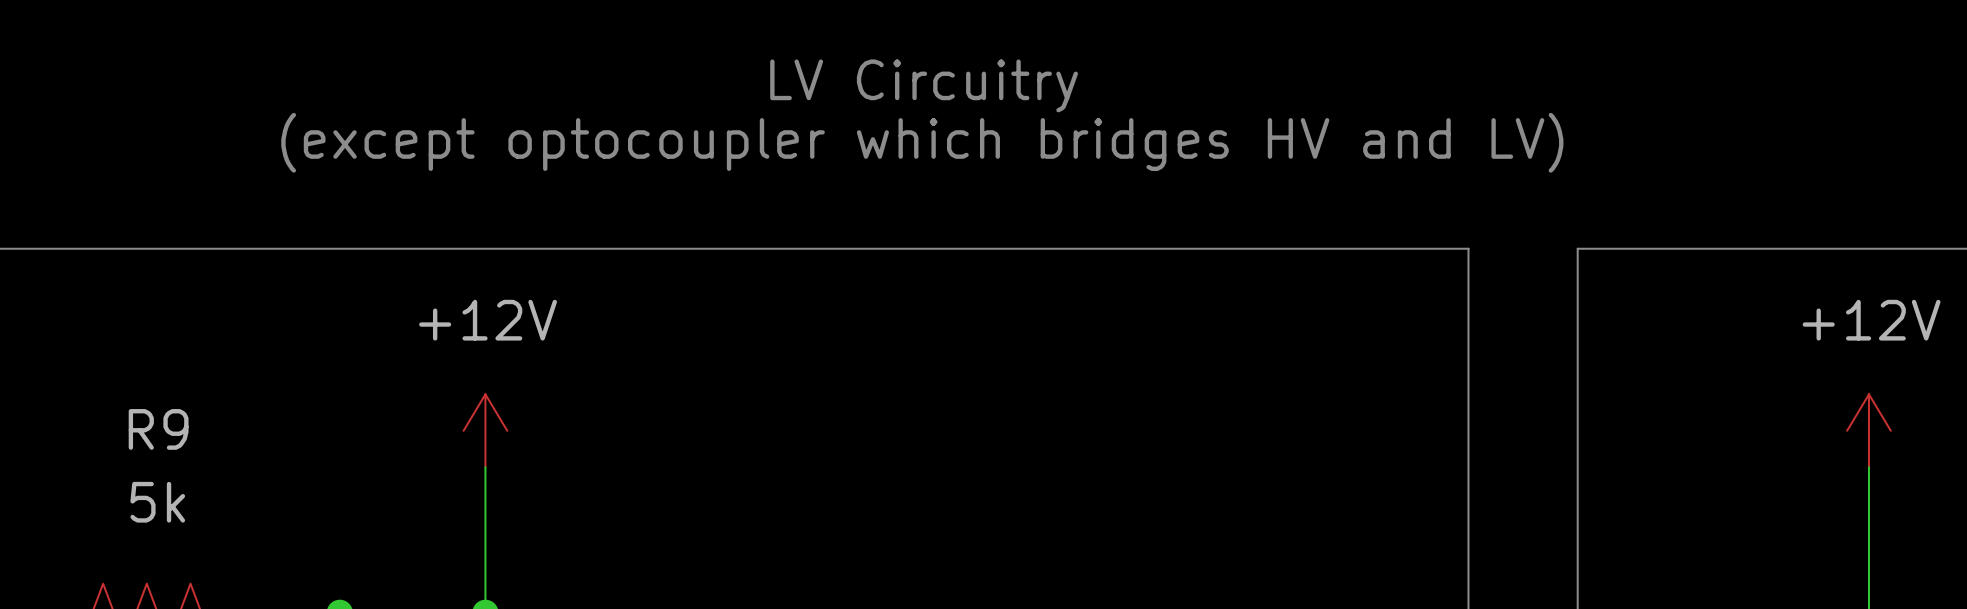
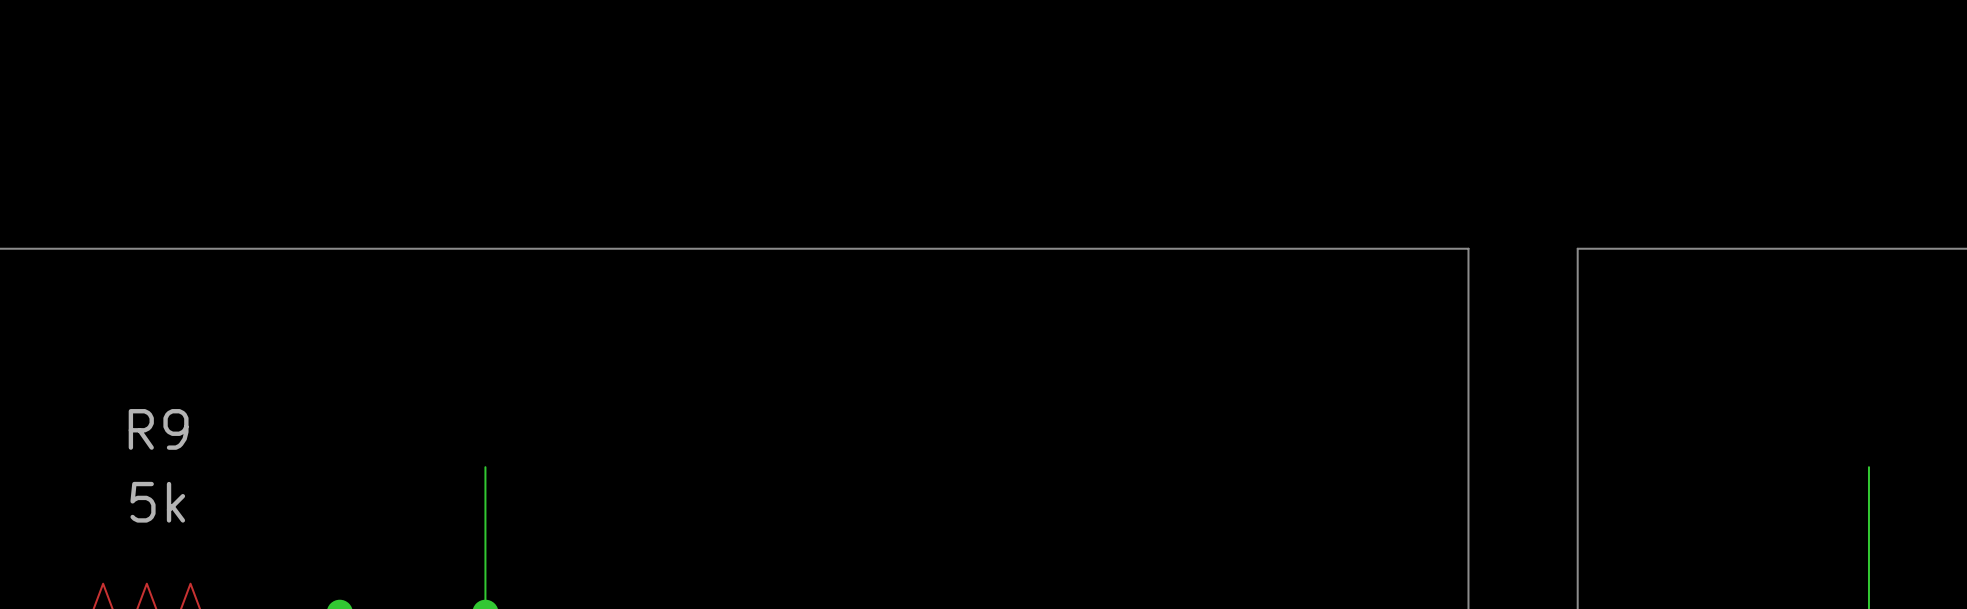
text: LV Circuitry (924, 85) -> none
text: (except optocoupler which bridges HV and LV) (922, 142) -> none
power symbol: +12V (485, 430) -> none
power symbol: +12V (1868, 430) -> none

